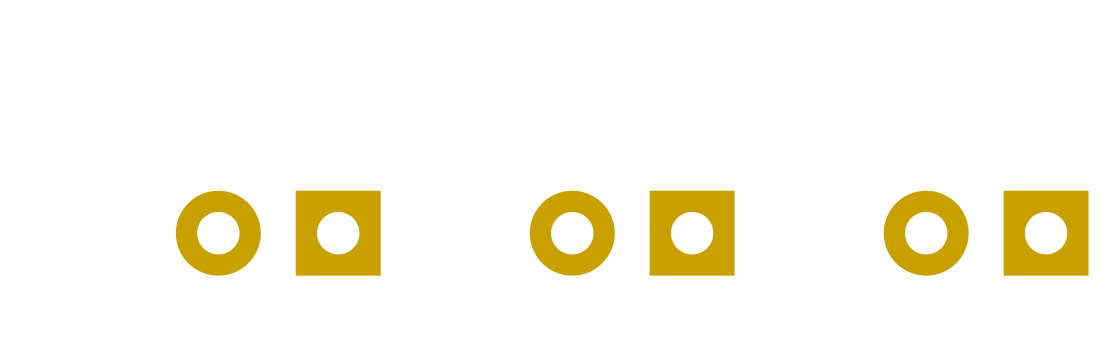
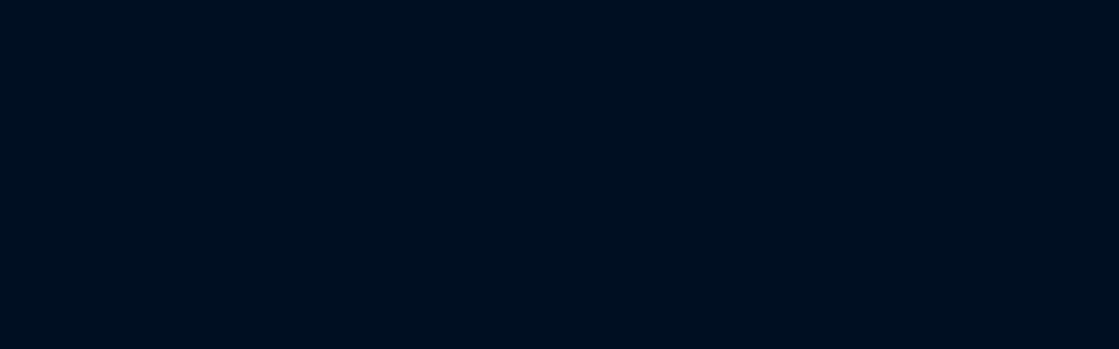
part: (278, 233) -> none
part: (632, 233) -> none
part: (986, 233) -> none

